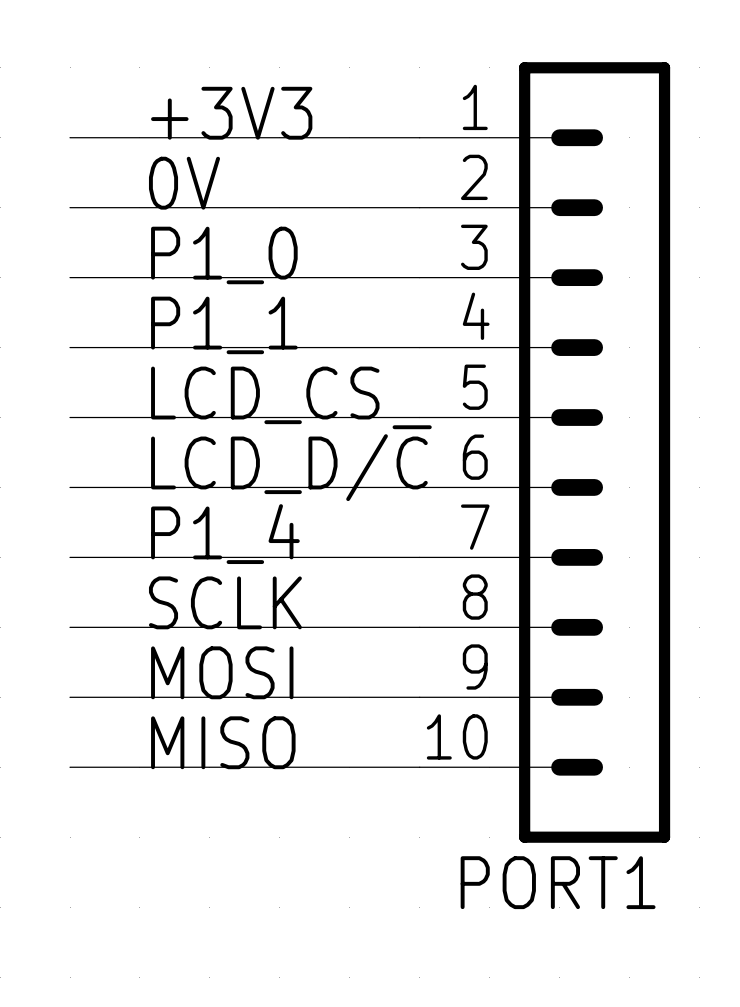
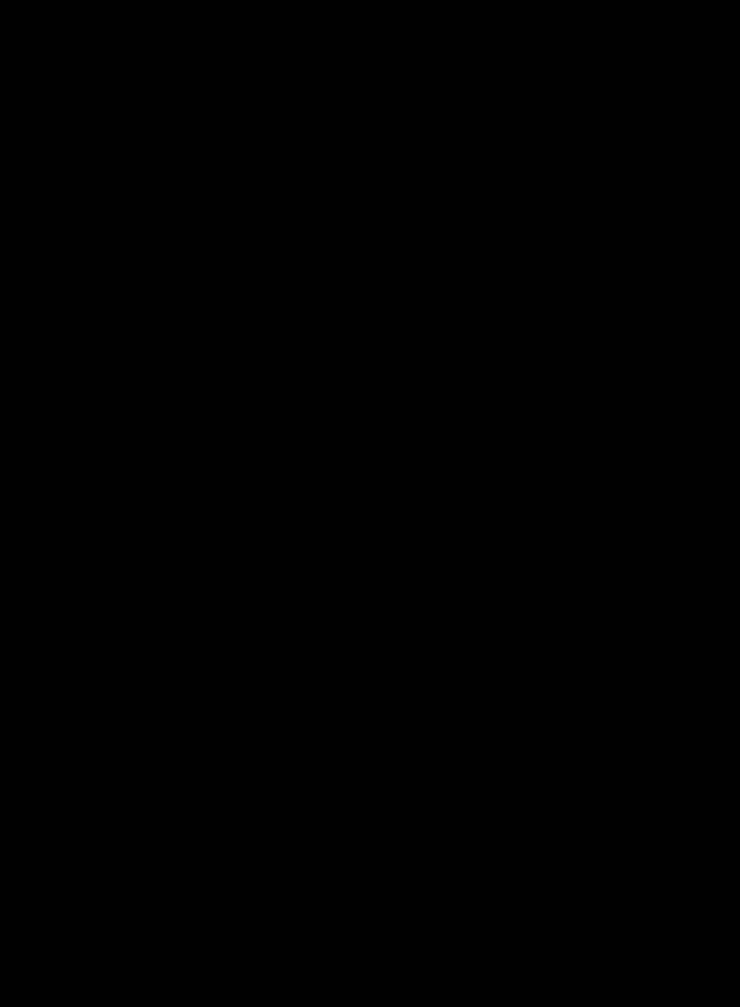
label: +3V3 (231, 113) -> none
wire: (70, 137) (419, 137) -> none
label: 0V (184, 183) -> none
wire: (70, 207) (419, 207) -> none
label: P1_0 (224, 255) -> none
wire: (70, 277) (419, 277) -> none
label: P1_1 (224, 325) -> none
wire: (70, 347) (419, 347) -> none
label: LCD_CS (265, 395) -> none
wire: (70, 417) (419, 417) -> none
PORT1: (544, 452) -> none
label: LCD_D/~{C} (291, 463) -> none
wire: (70, 487) (419, 487) -> none
label: P1_4 (225, 534) -> none
wire: (70, 557) (419, 557) -> none
label: SCLK (225, 602) -> none
wire: (70, 627) (419, 627) -> none
label: MOSI (222, 672) -> none
wire: (70, 697) (419, 697) -> none
label: MISO (223, 742) -> none
wire: (70, 767) (419, 767) -> none

